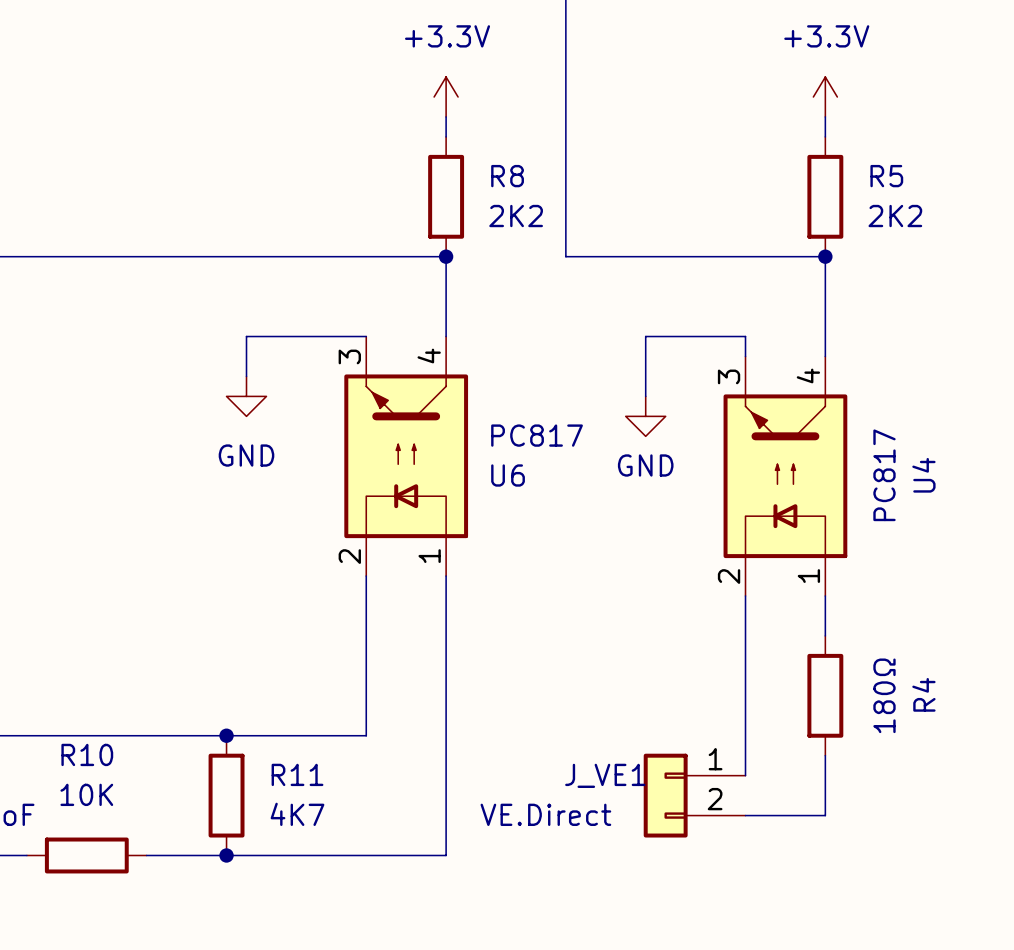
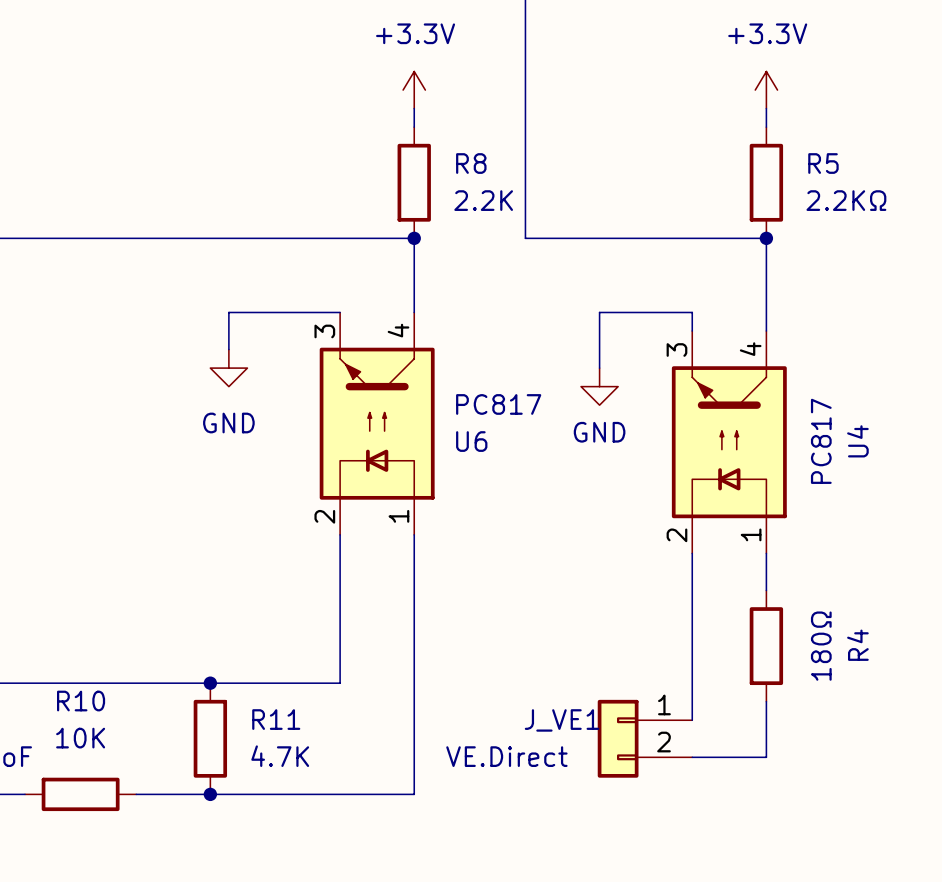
R8 value: 2K2 (516, 216) -> 2.2K (483, 200)
R5 value: 2K2 (895, 216) -> 2.2KΩ (846, 200)
R11 value: 4K7 (297, 814) -> 4.7K (280, 756)

